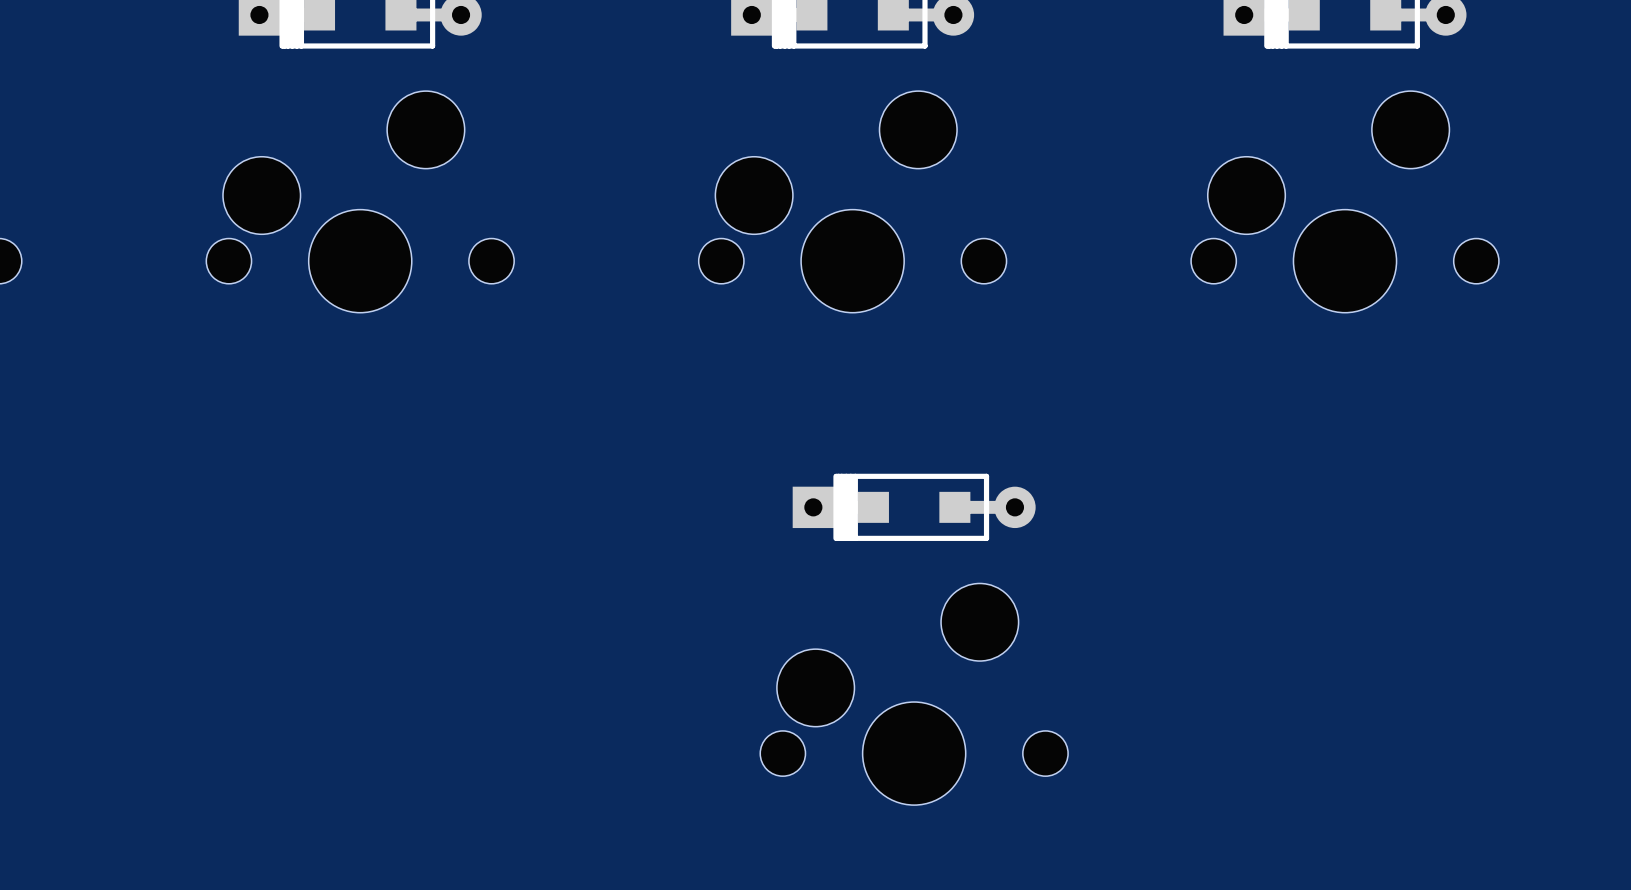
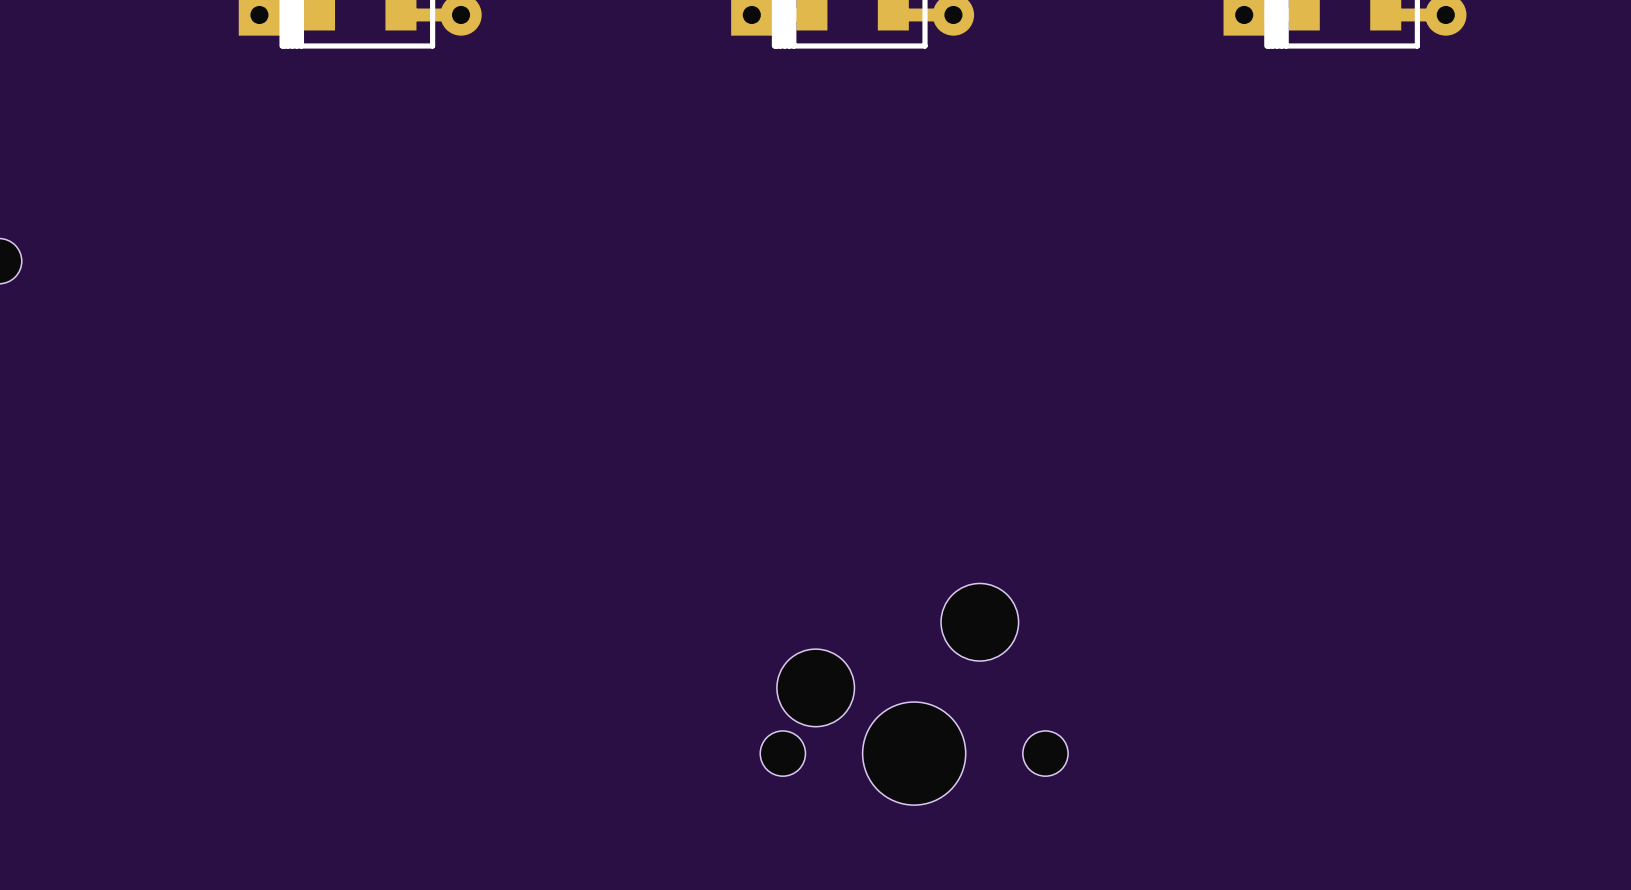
part: (360, 201) -> none
part: (852, 201) -> none
part: (1345, 201) -> none
part: (914, 507) -> none

